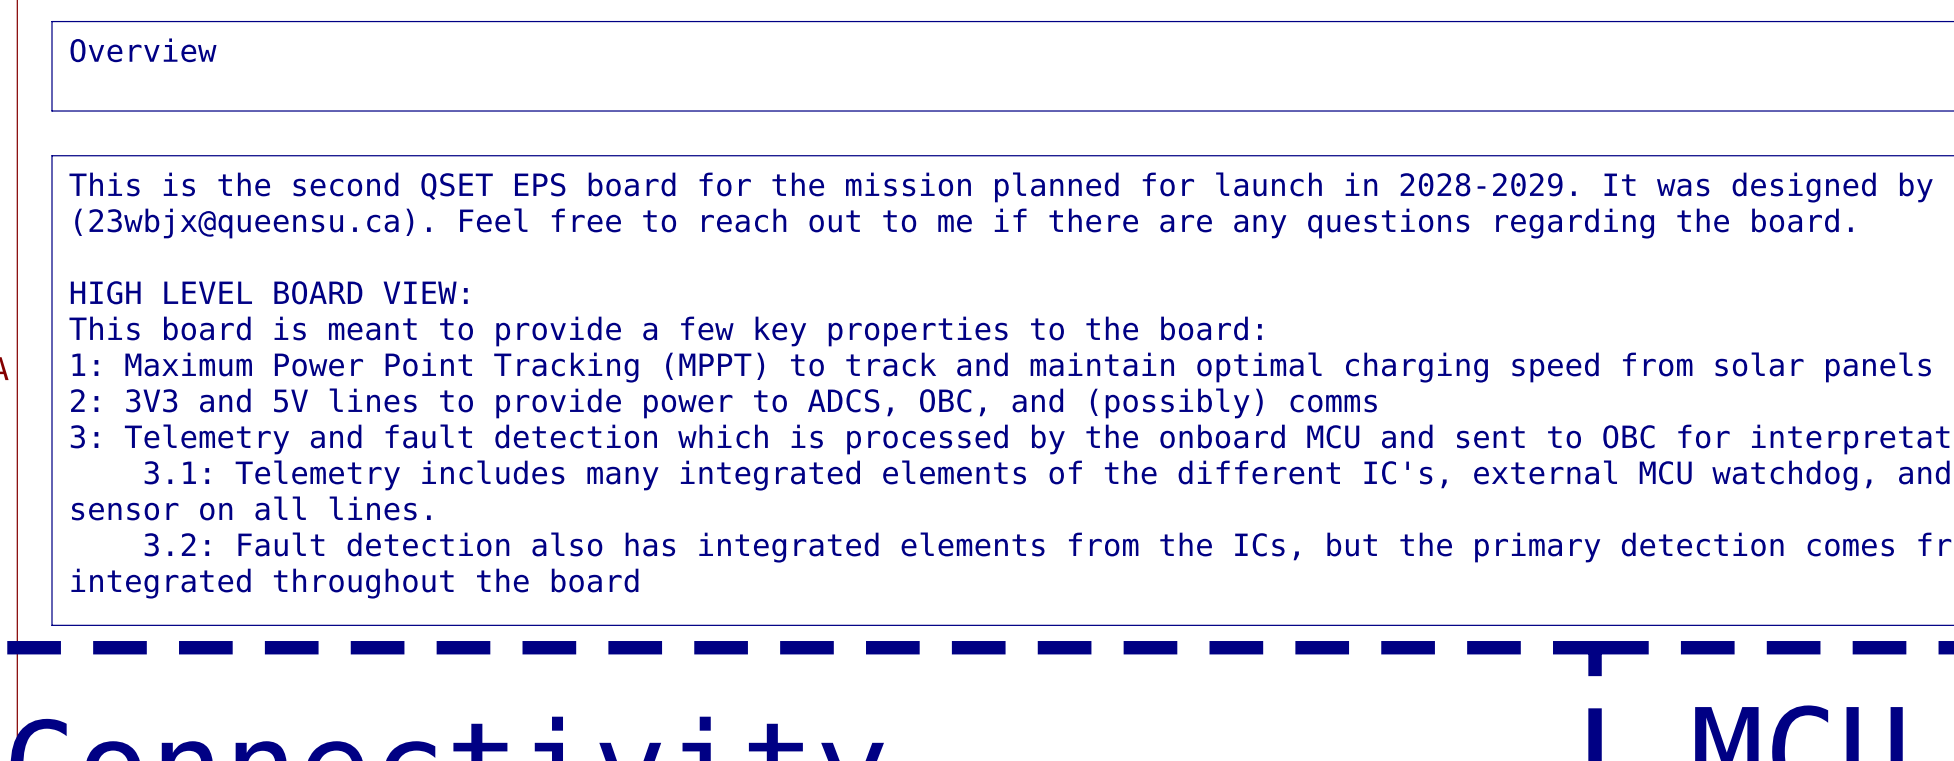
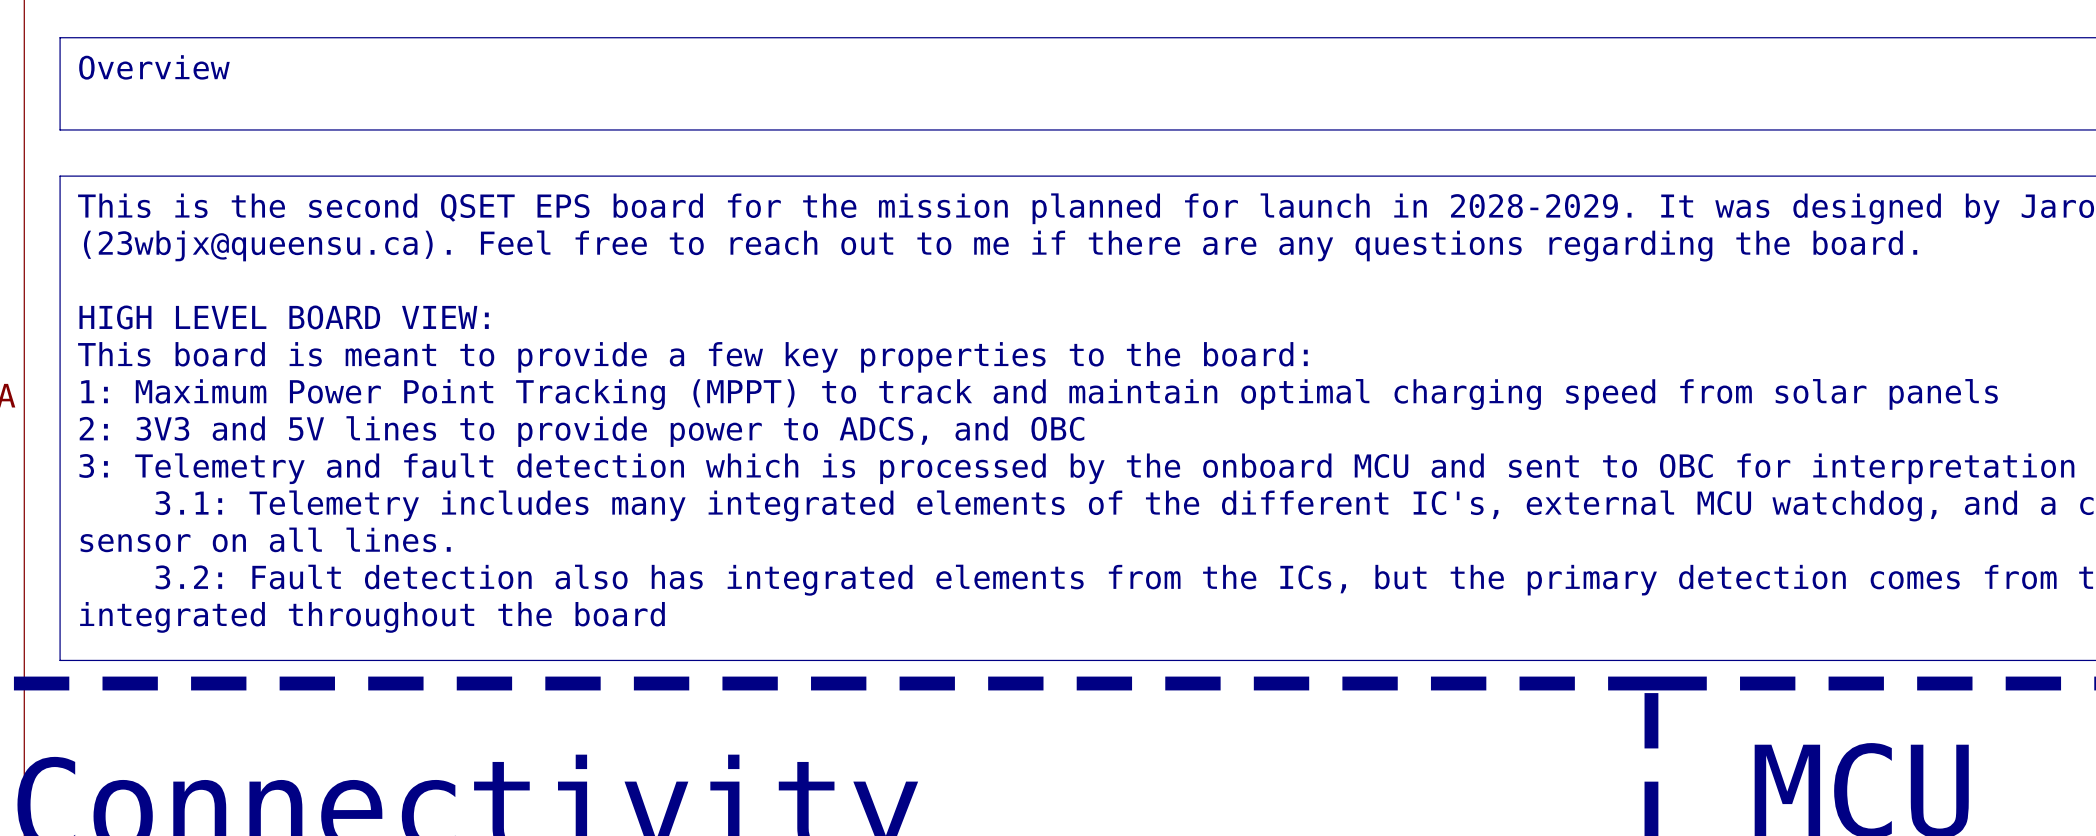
text: 2: 3V3 and 5V lines to provide power to ADCS, OBC, and (possibly) comms (723, 403) -> 2: 3V3 and 5V lines to provide power to ADCS, and OBC (582, 431)

